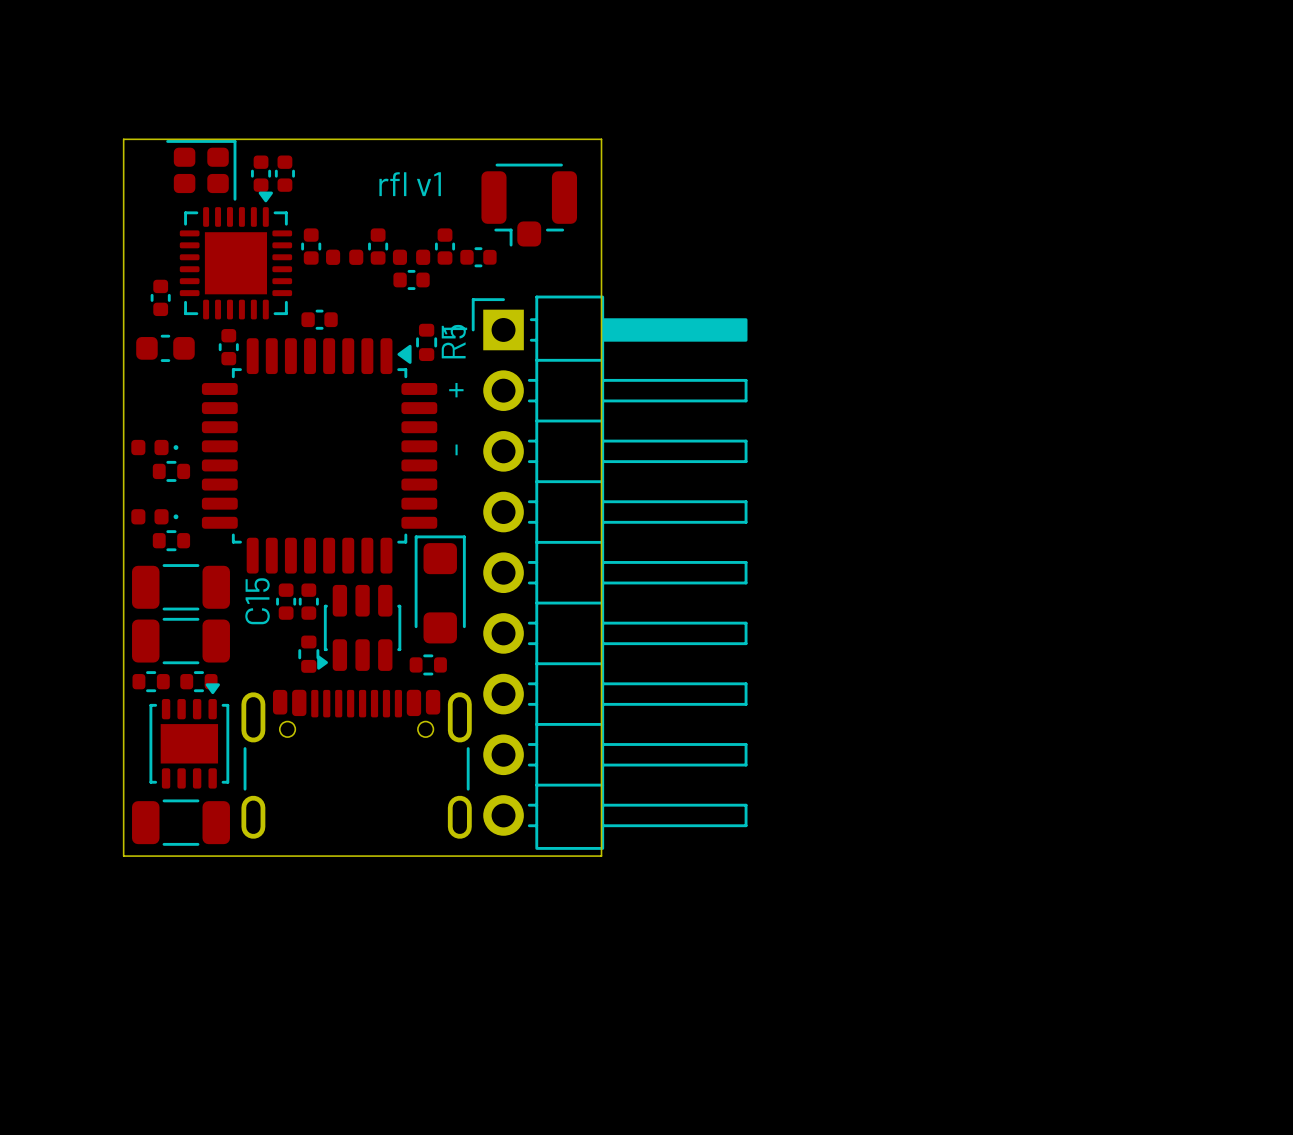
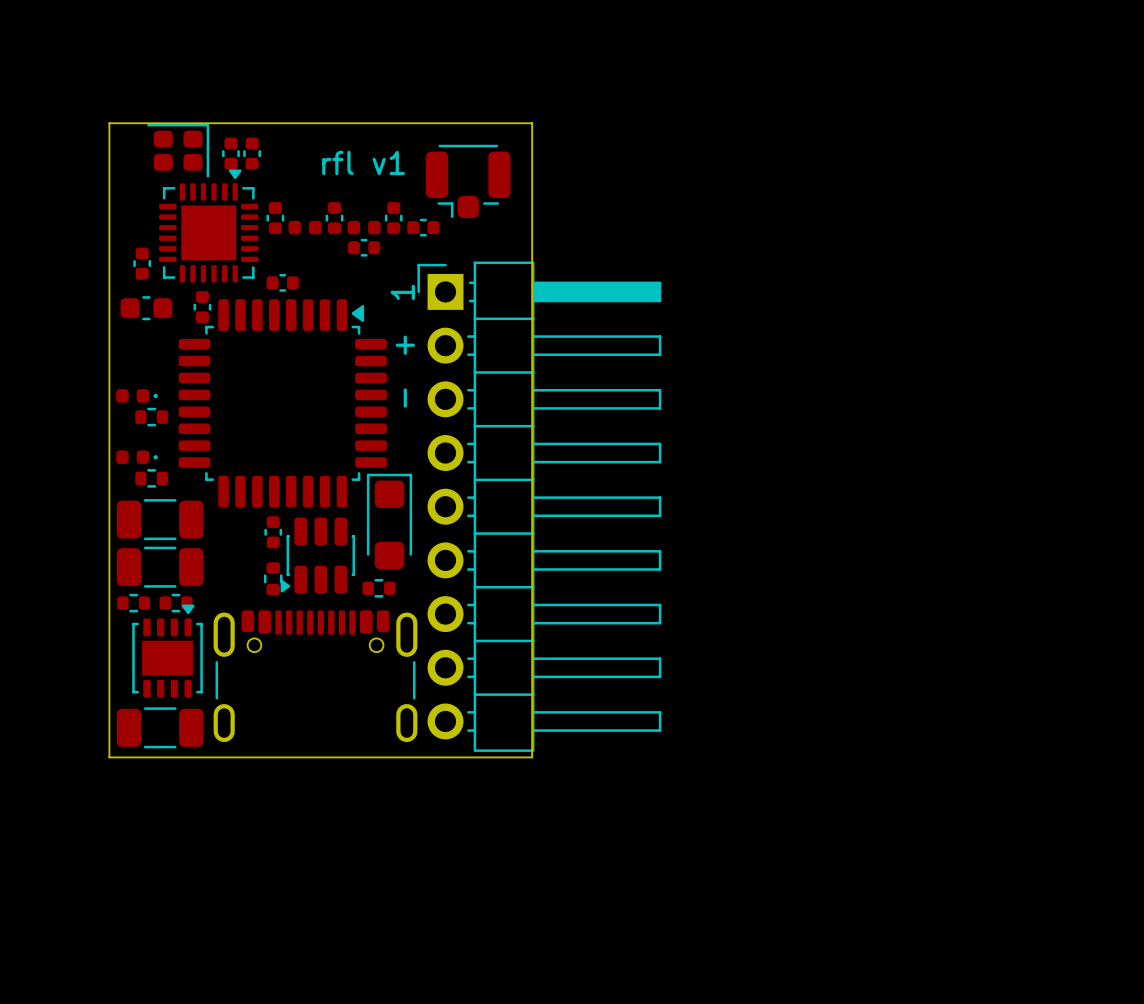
R5: (426, 342) -> none
C15: (286, 601) -> none

